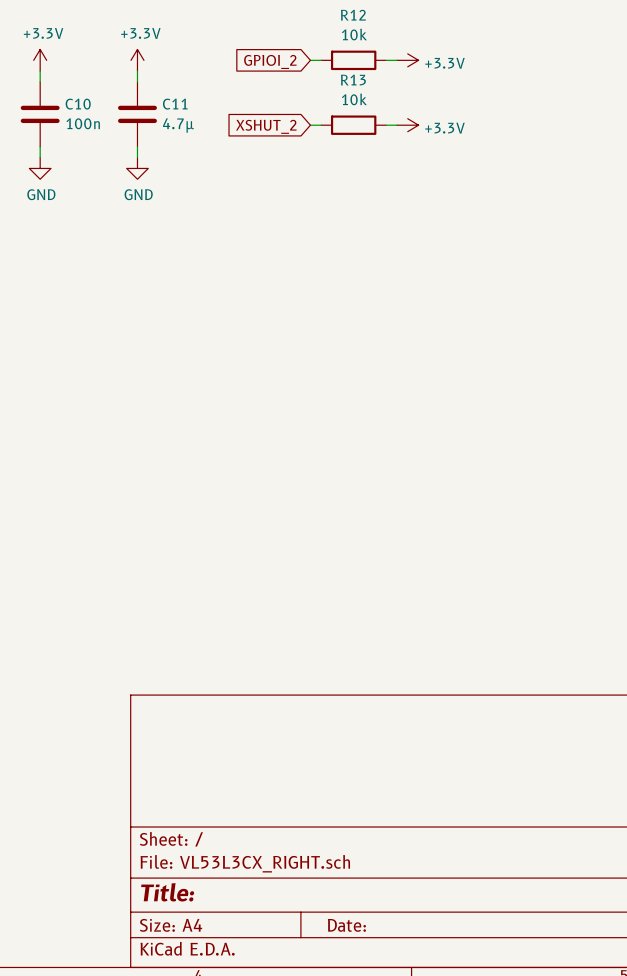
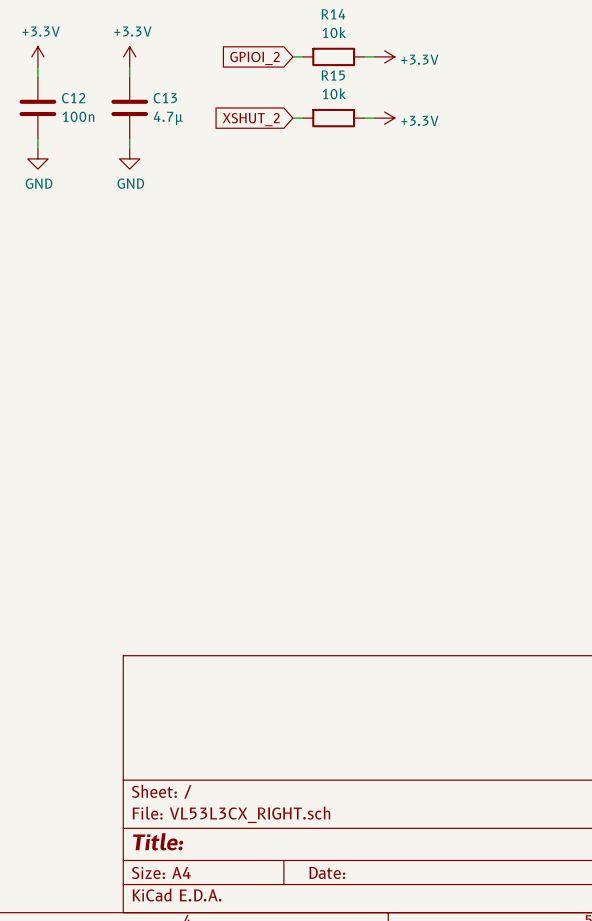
R12 name: R12 (353, 15) -> R14 (333, 14)
R13 name: R13 (353, 80) -> R15 (333, 75)
C10 name: C10 (78, 104) -> C12 (73, 98)
C11 name: C11 (175, 104) -> C13 (165, 98)

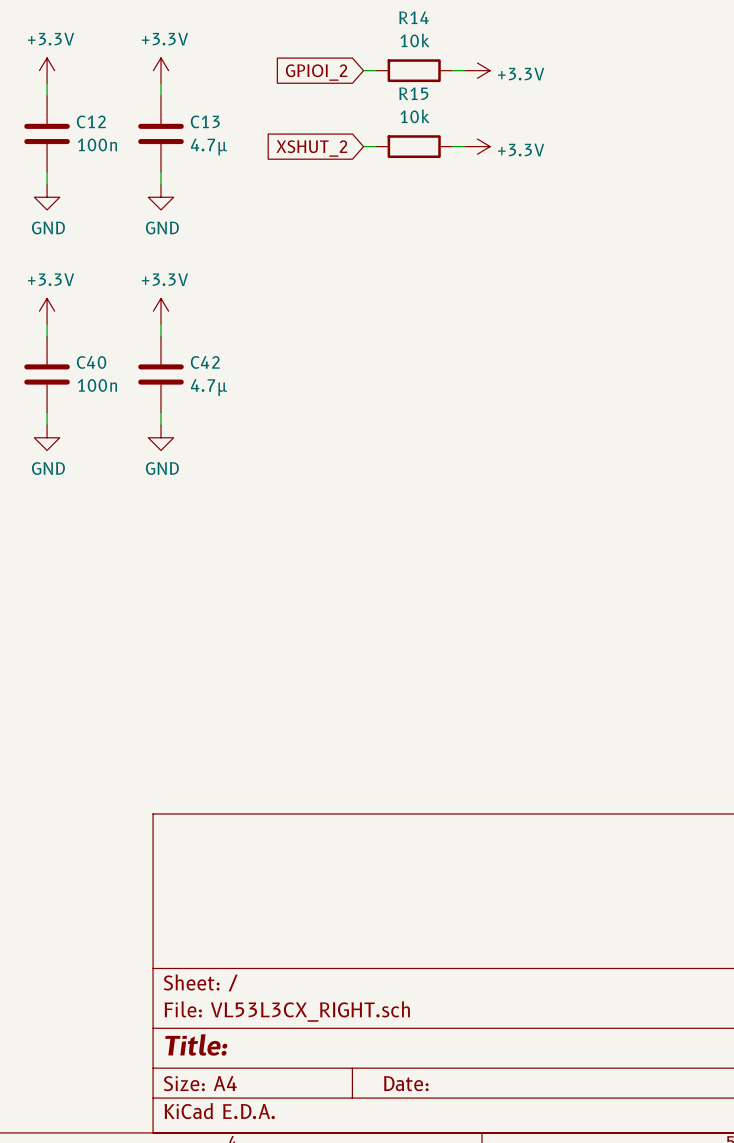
power symbol: none -> +3.3V (47, 311)
power symbol: none -> +3.3V (160, 311)
wire: none -> (47, 323) (47, 336)
wire: none -> (160, 323) (160, 336)
C40: none -> 100n (47, 374)
C42: none -> 4.7µ (160, 374)
wire: none -> (47, 412) (47, 425)
wire: none -> (160, 412) (160, 425)
power symbol: none -> GND (47, 437)
power symbol: none -> GND (160, 437)

